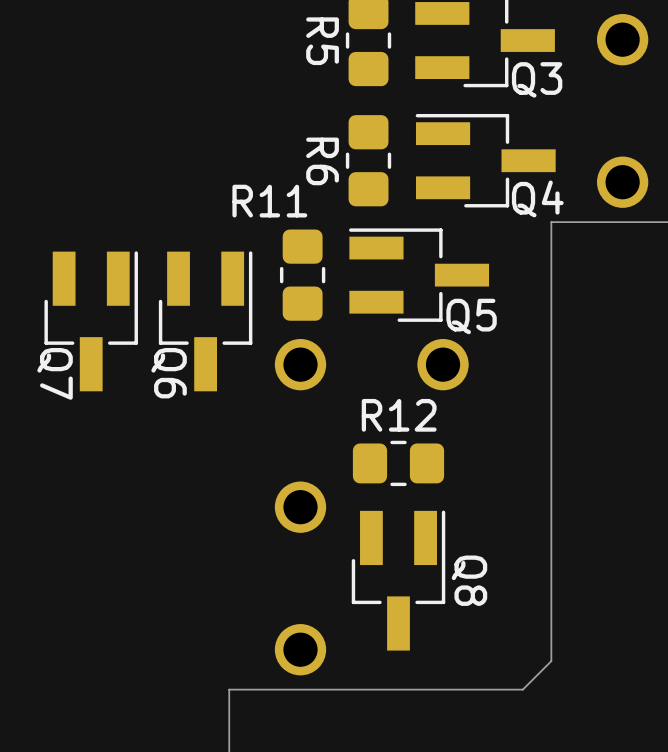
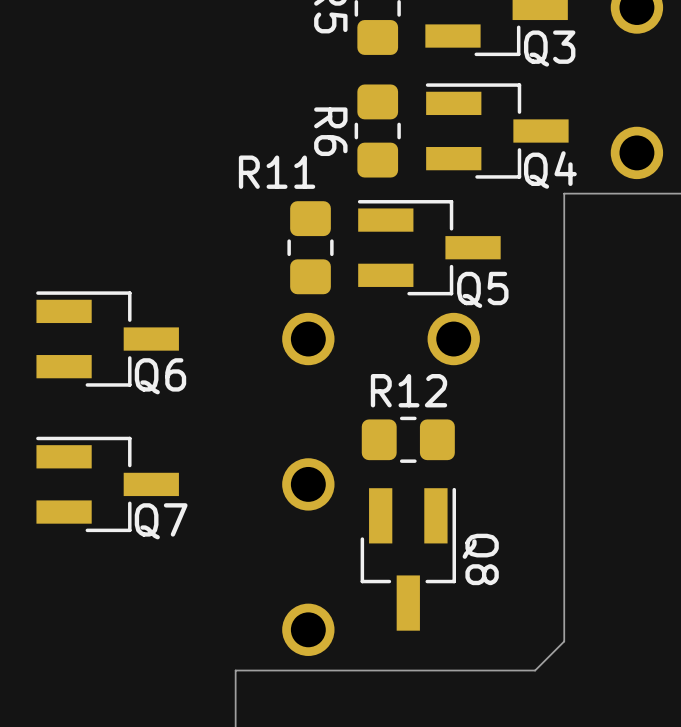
Q7 rotation: 0° (91, 321) -> 90° counterclockwise (107, 484)
Q7 position: (91, 321) -> (107, 484)
Q6 rotation: 0° (205, 321) -> 90° counterclockwise (107, 339)
Q6 position: (205, 321) -> (107, 339)

